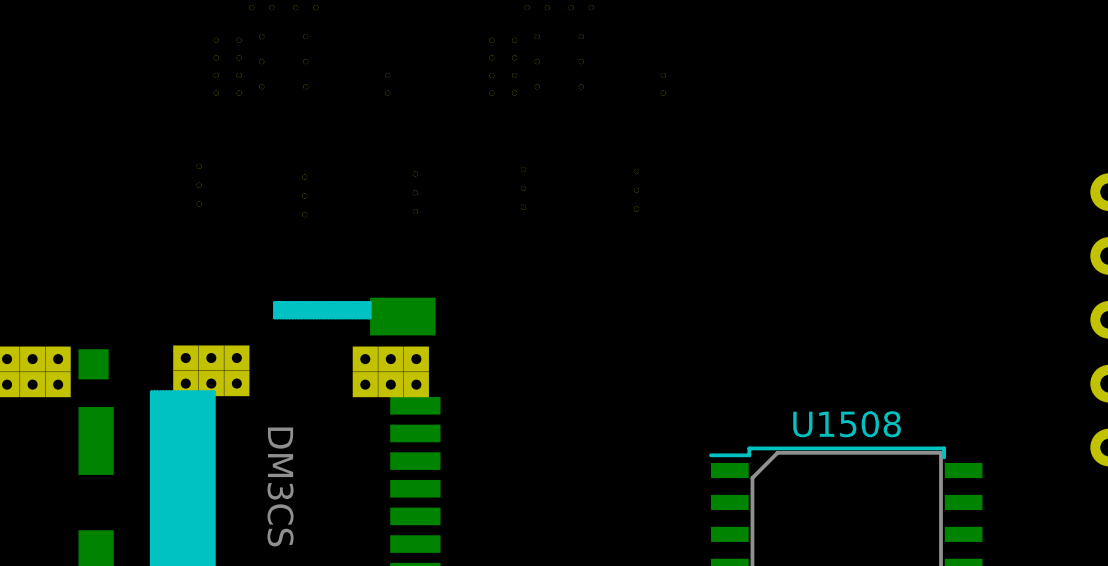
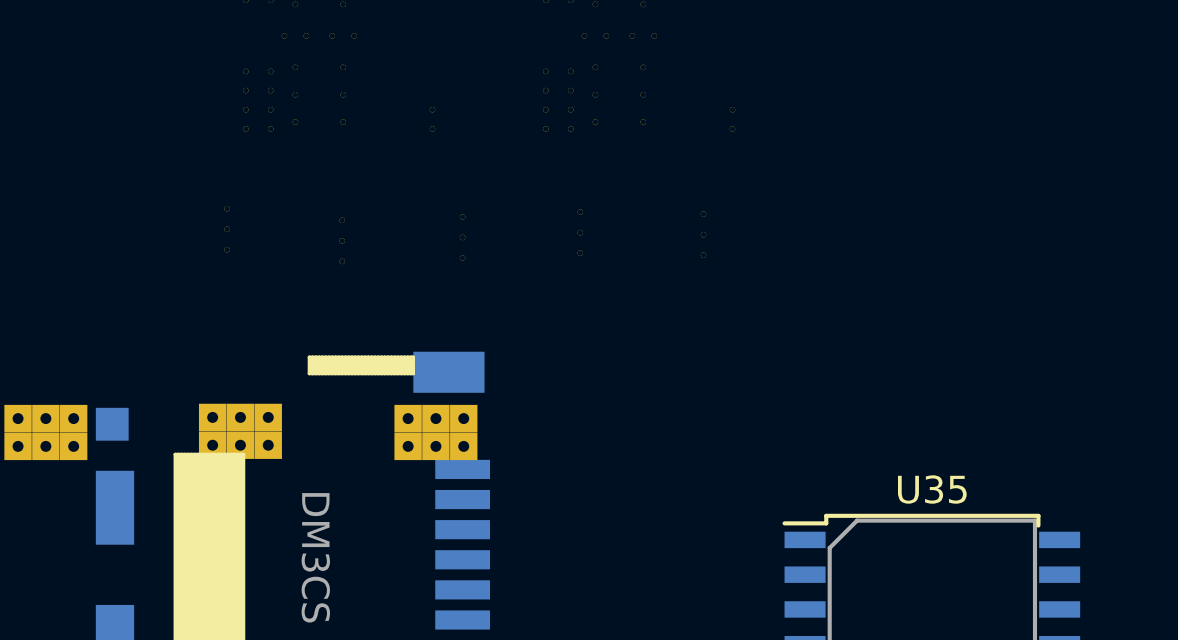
U1508 name: U1508 (847, 424) -> U35 (932, 489)

